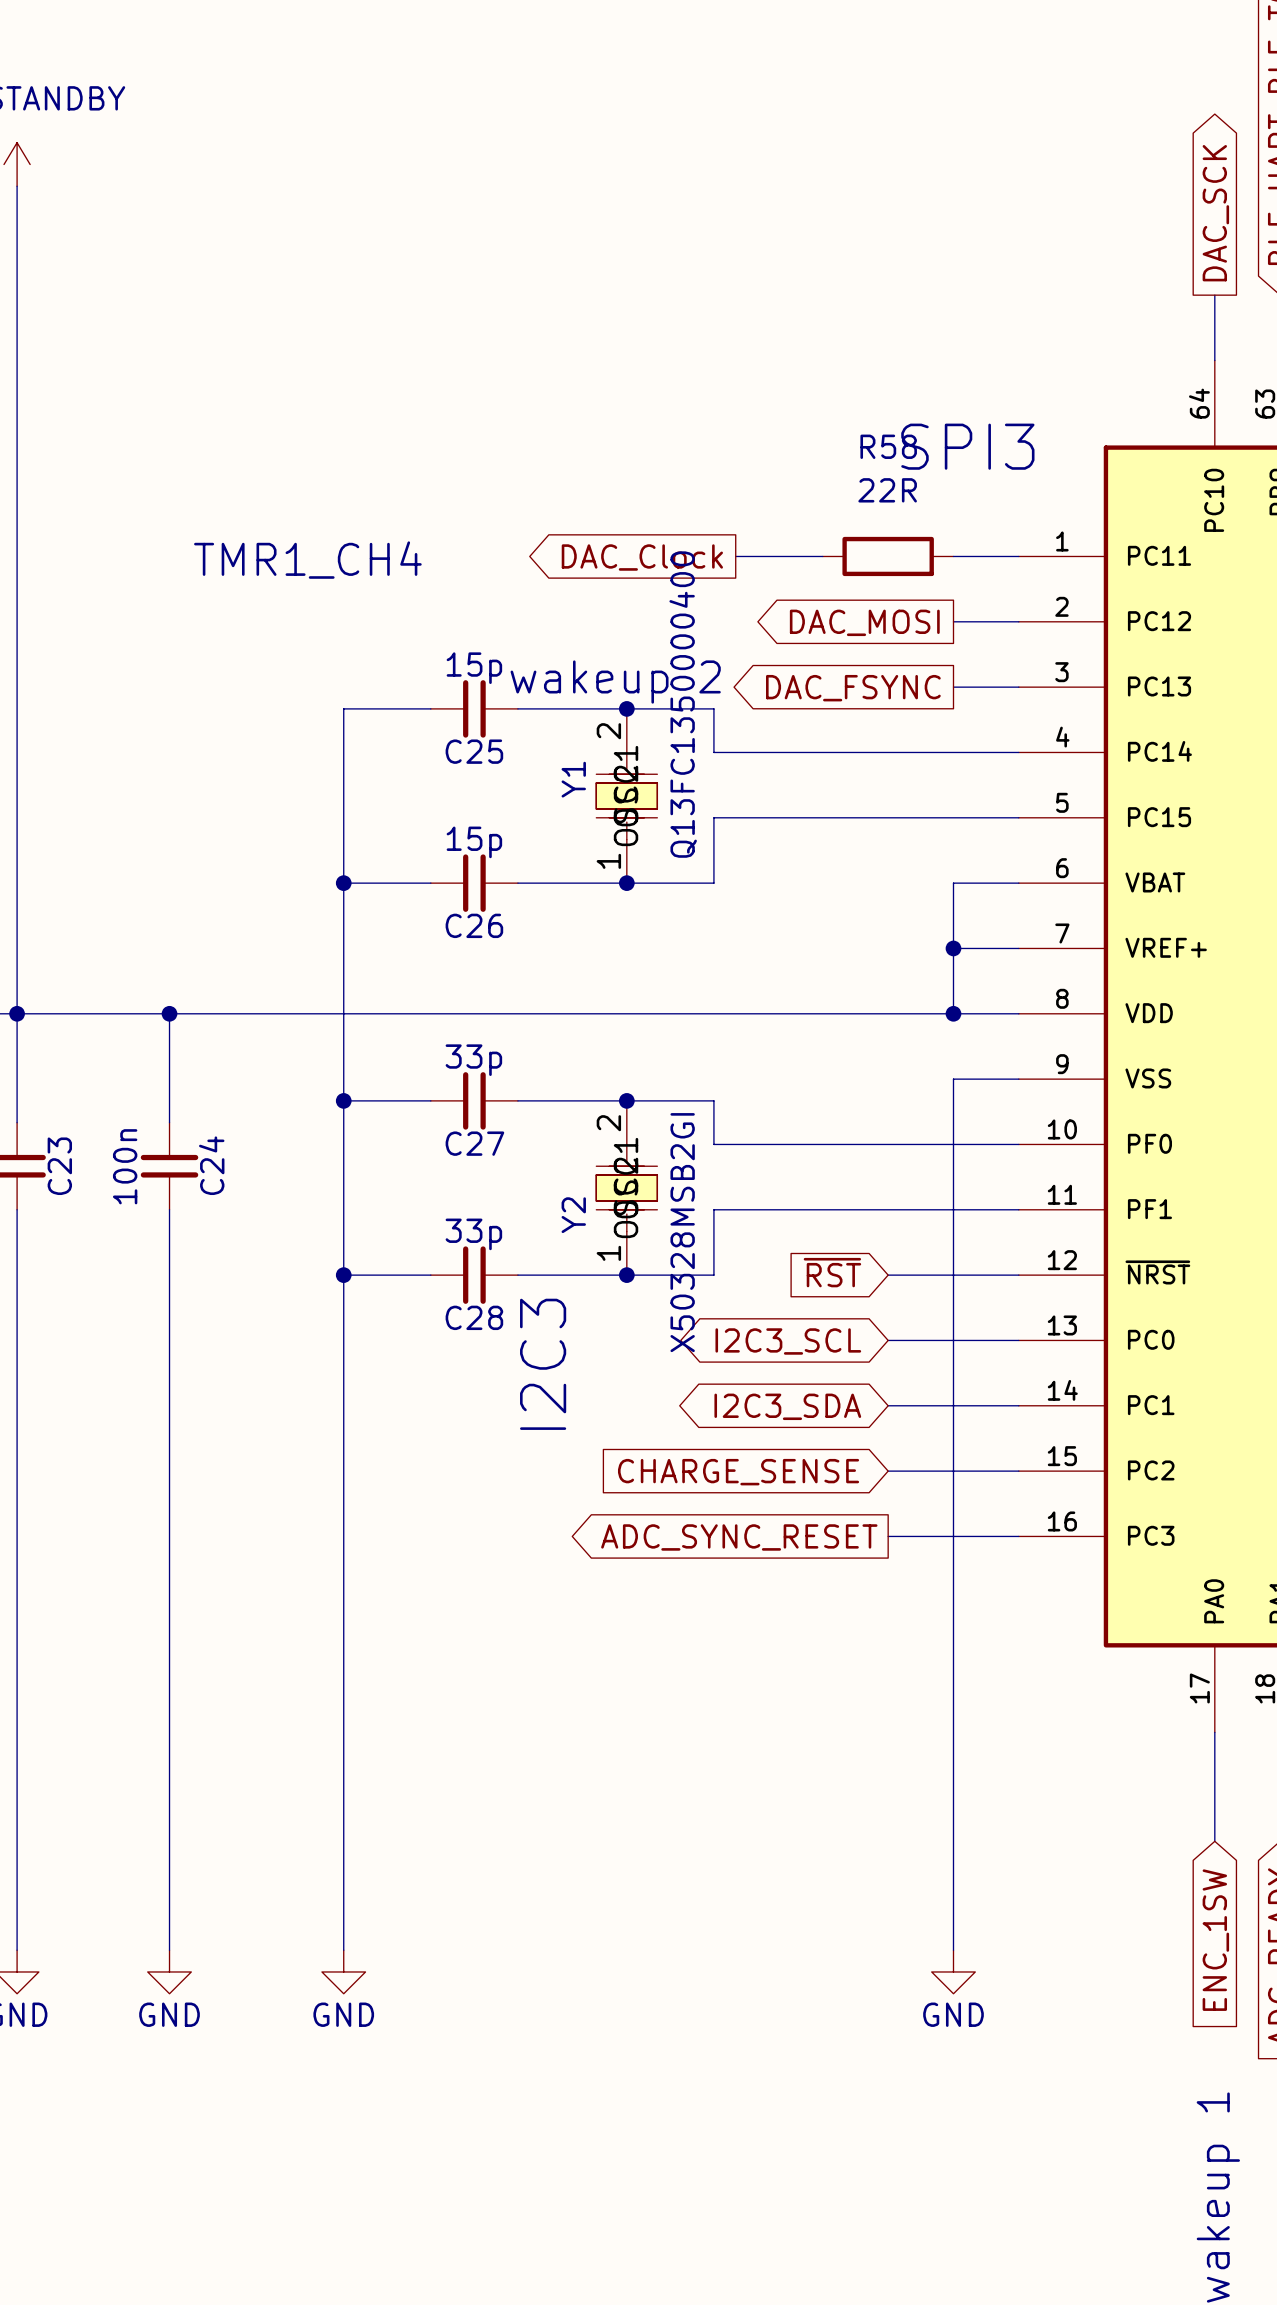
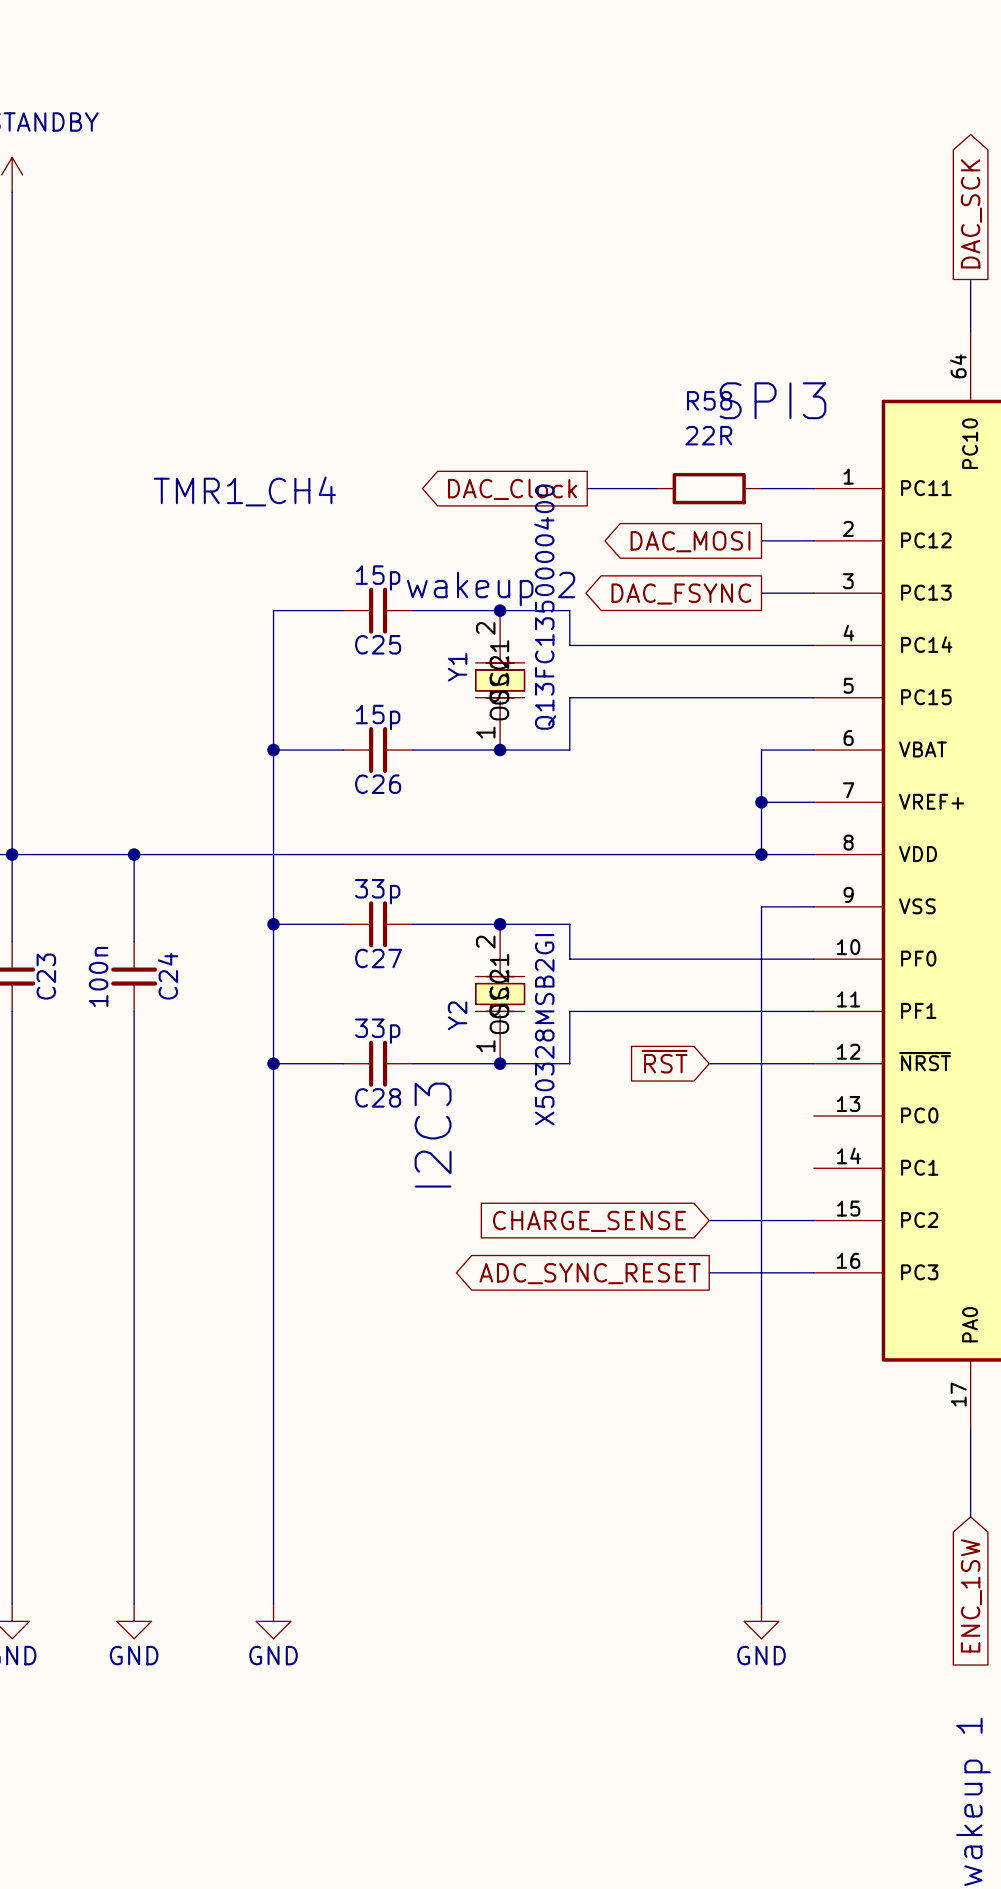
wire: (888, 1340) (1018, 1340) -> none
global label: I2C3_SCL (788, 1341) -> none
wire: (888, 1405) (1018, 1405) -> none
global label: I2C3_SDA (787, 1406) -> none

